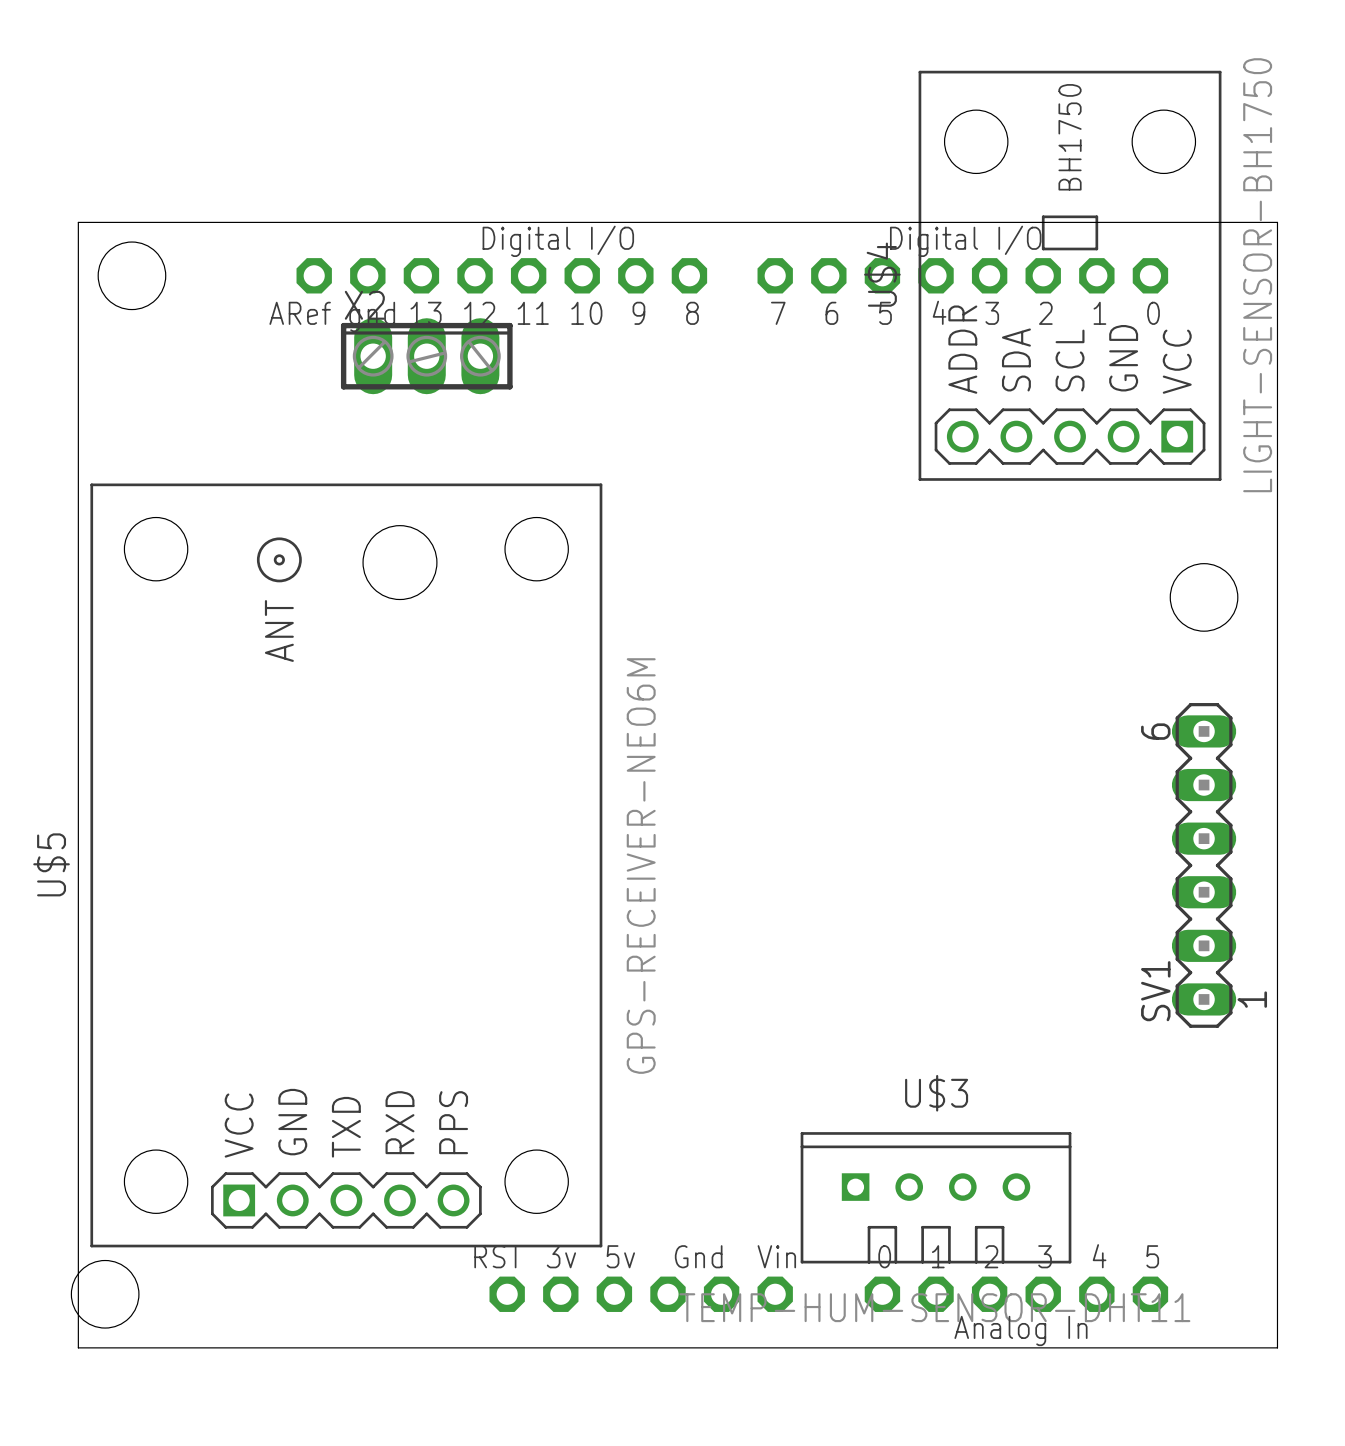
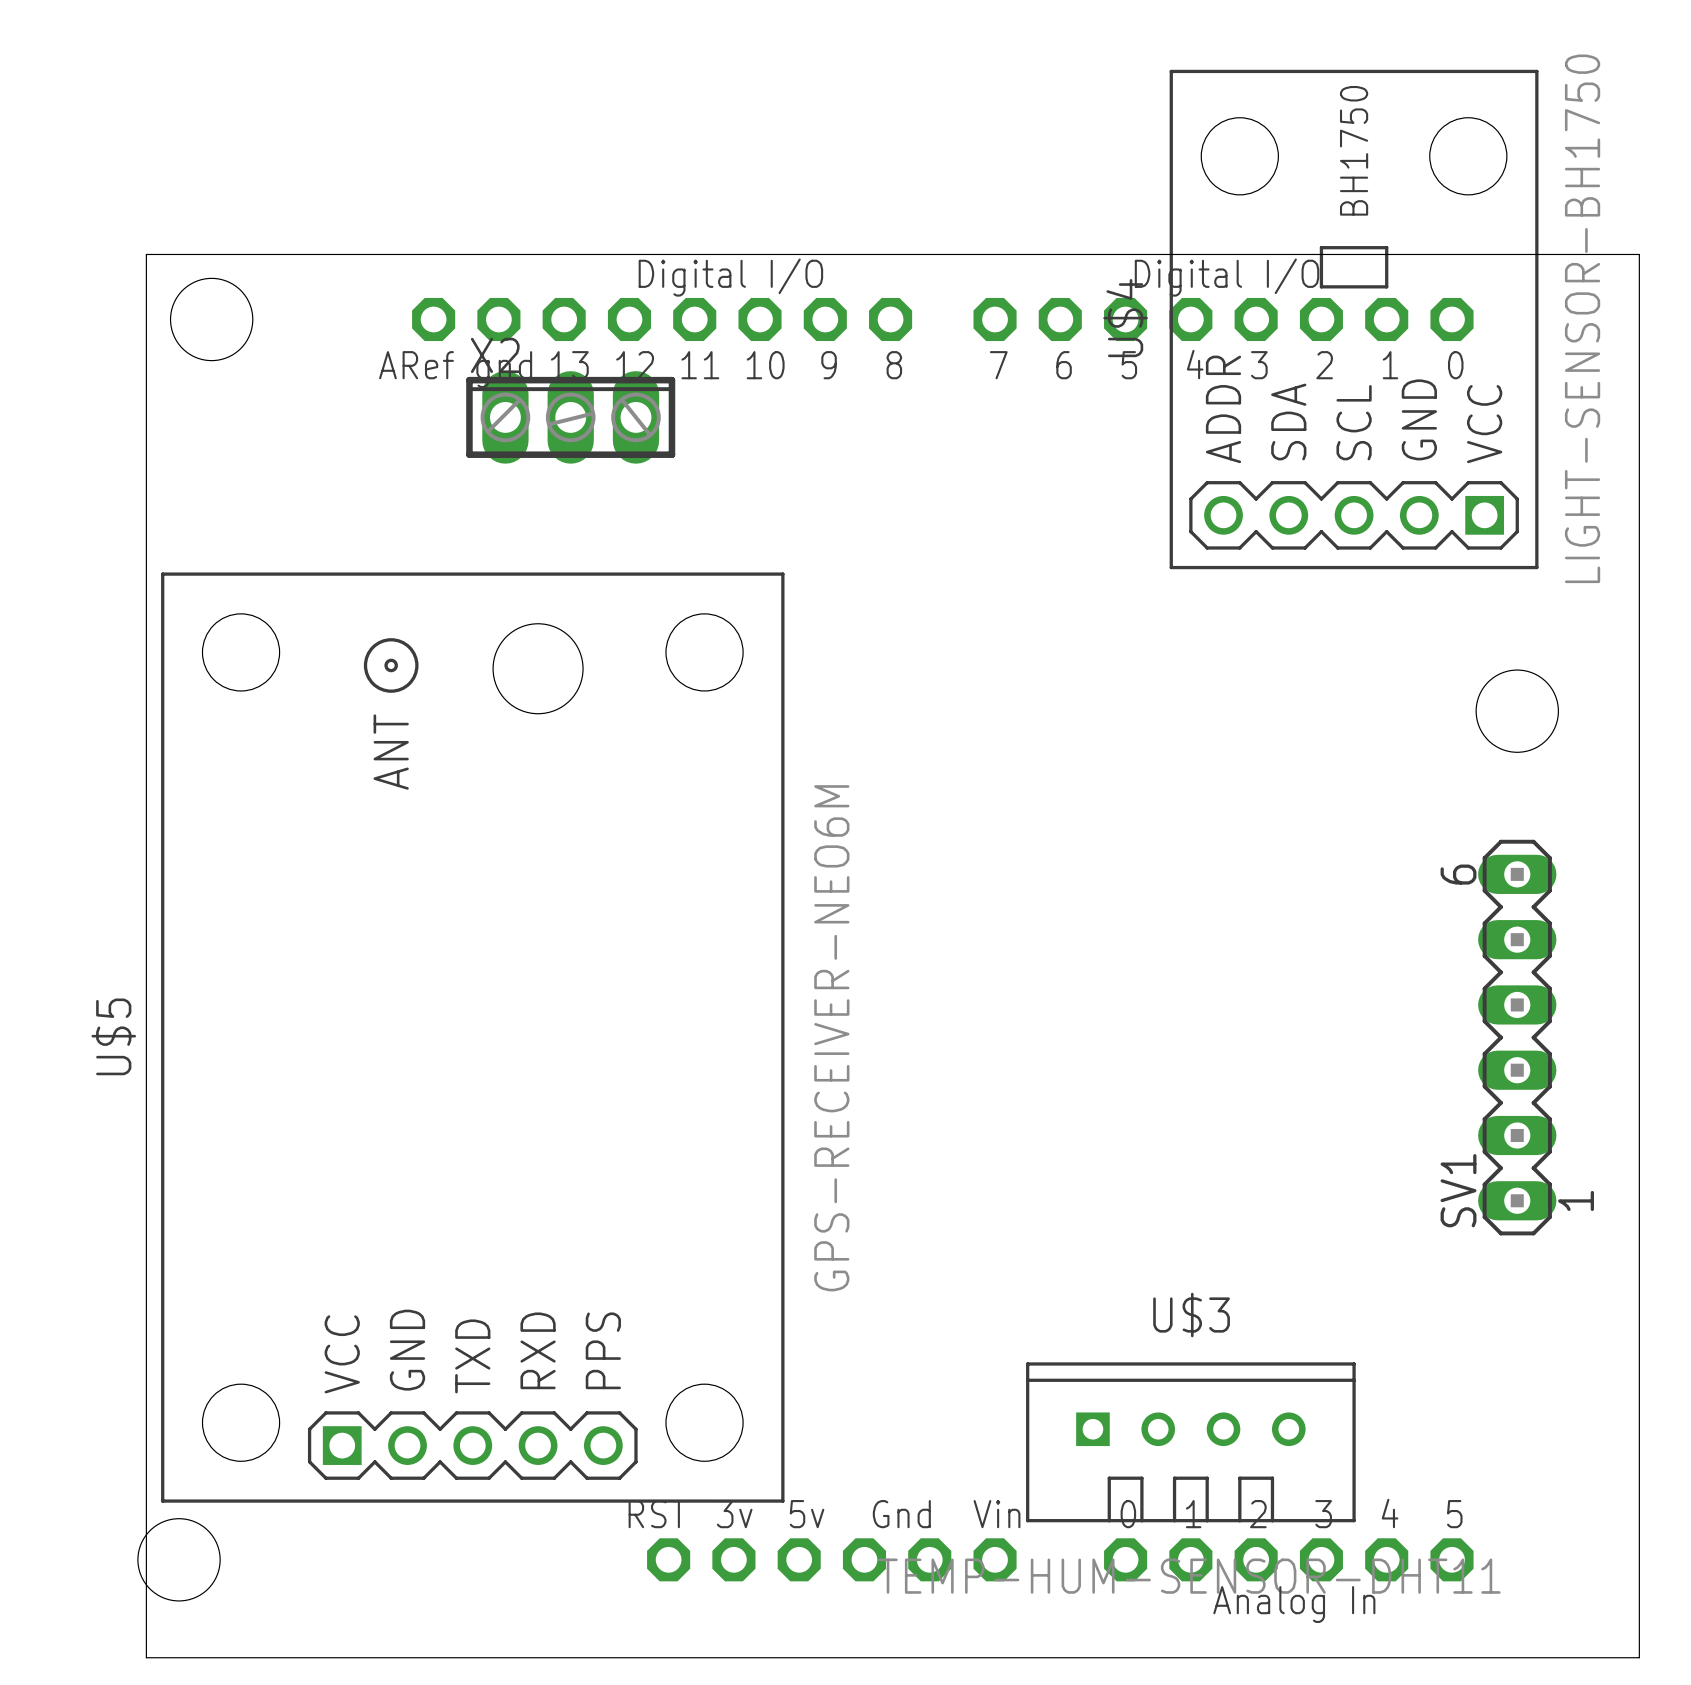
board edge: (1277, 222) (1277, 1347) (78, 1347) -> (1606, 254) (1639, 254) (1639, 1657) (146, 1657) (146, 1625)

